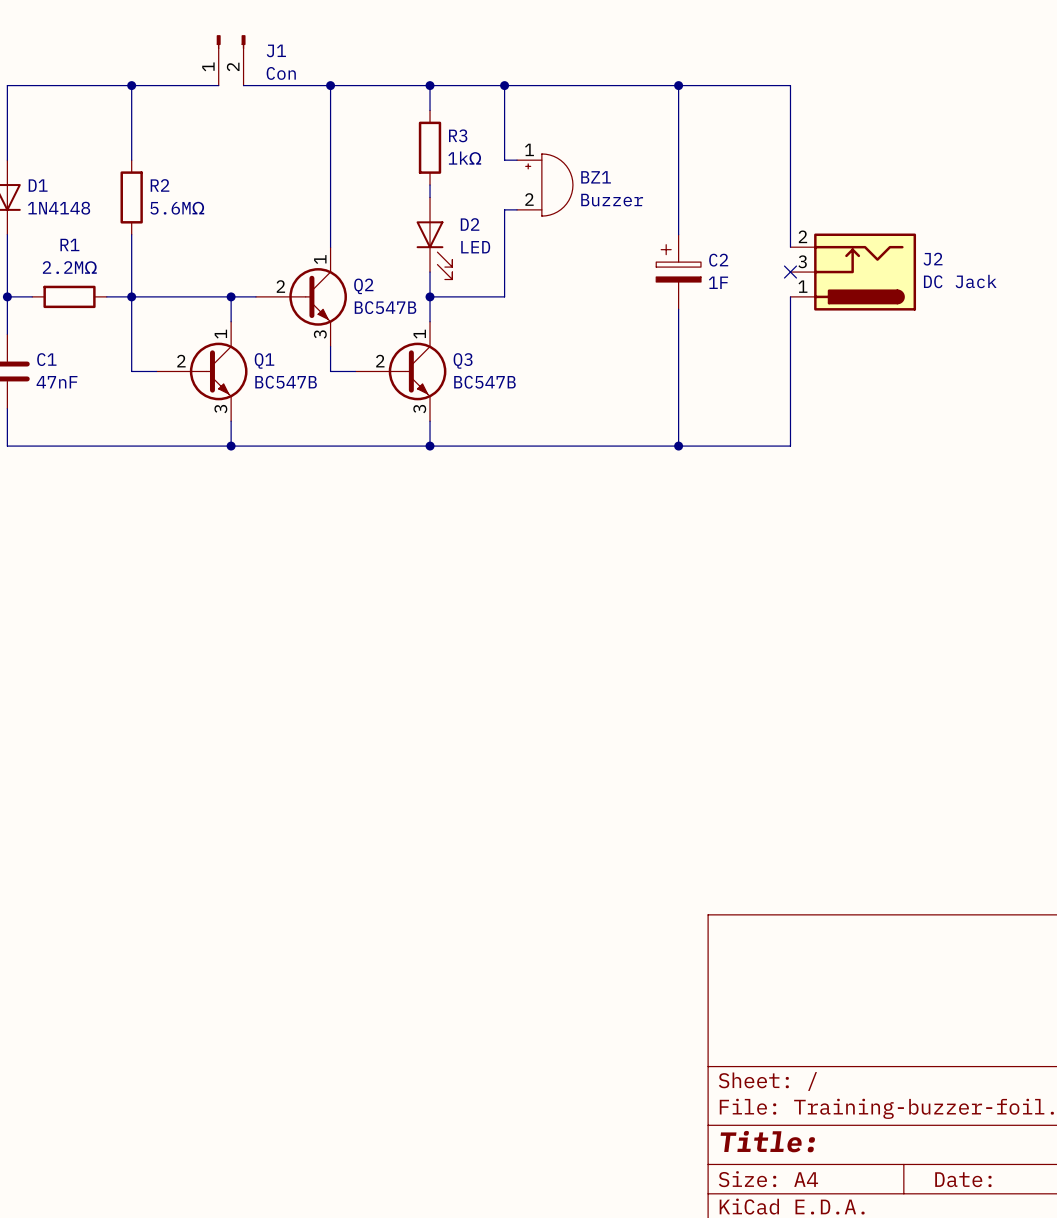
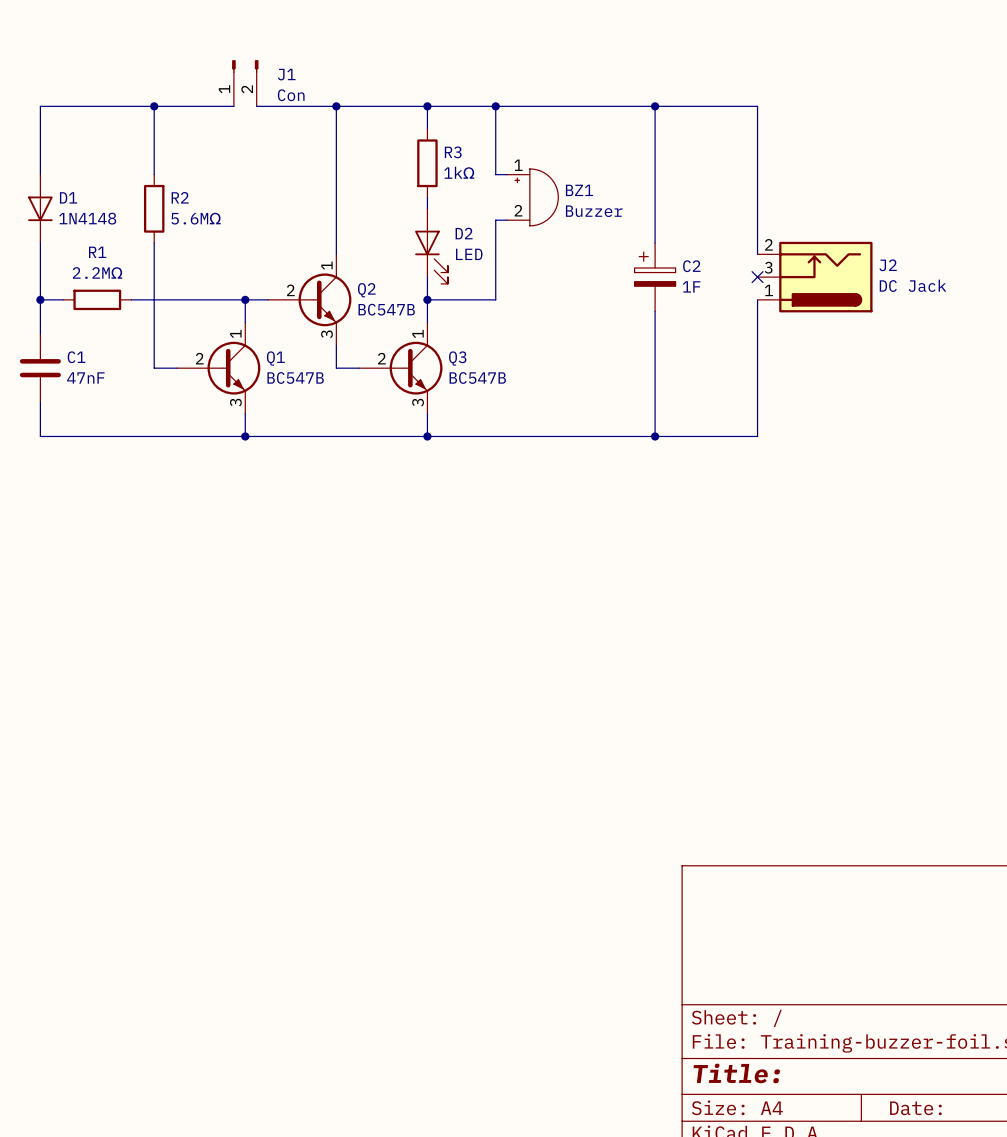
junction: (131, 296) -> none

